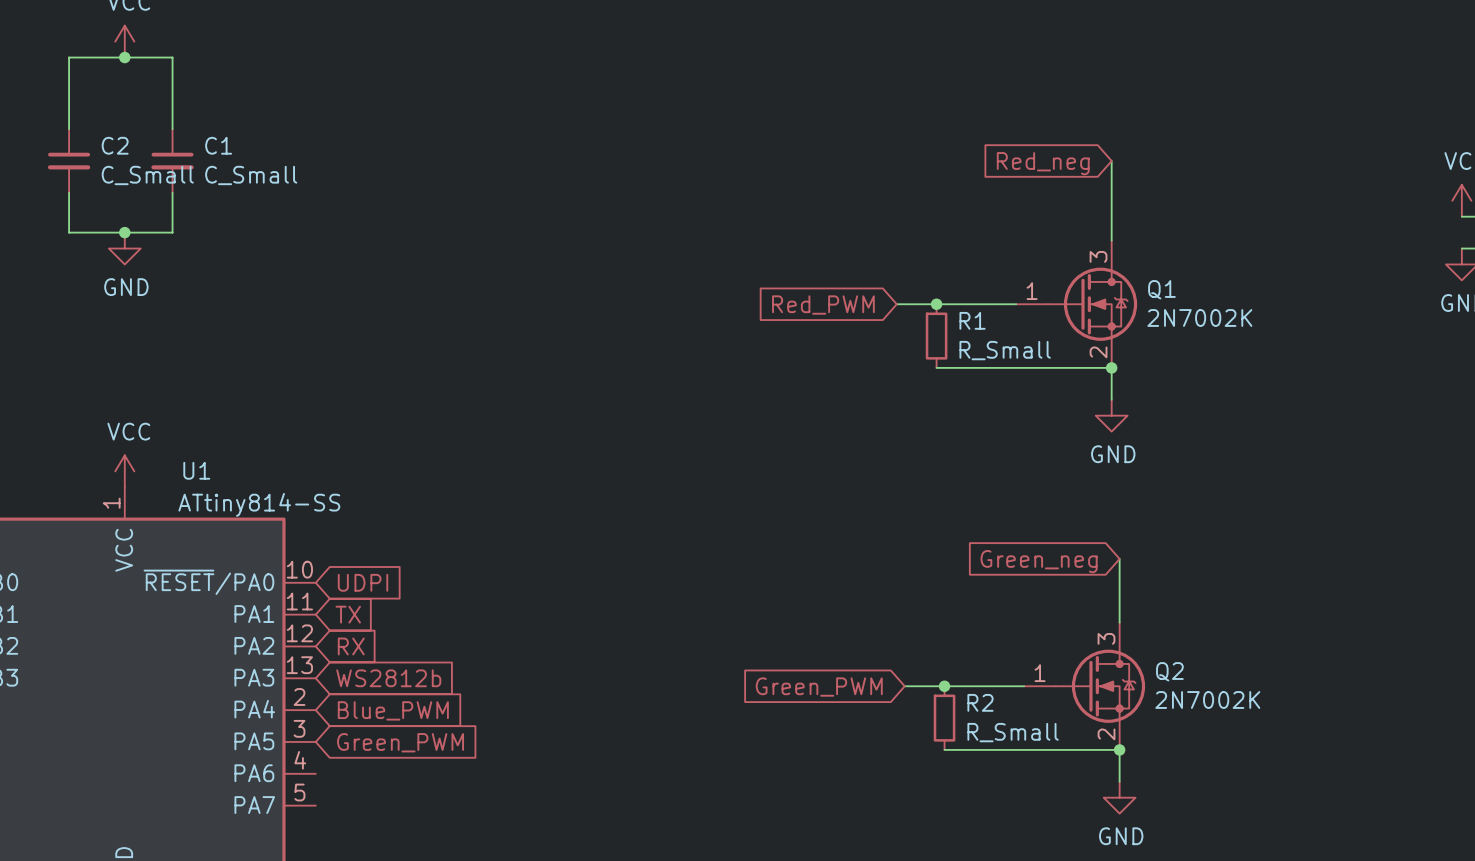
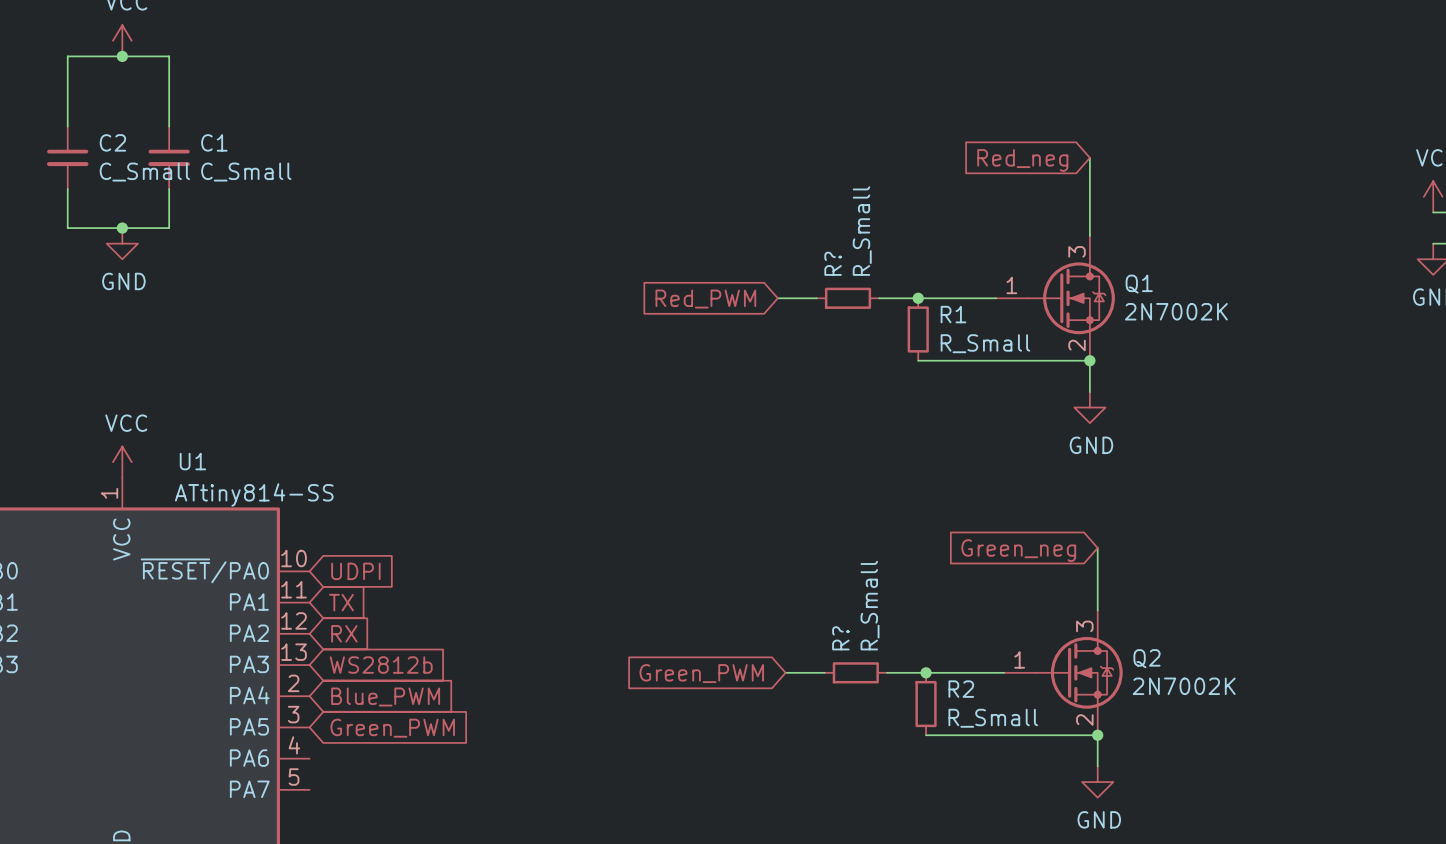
wire: none -> (777, 298) (816, 298)
R?: none -> R_Small (848, 298)
global label position: Red_PWM (823, 305) -> Red_PWM (705, 299)
wire: none -> (785, 672) (824, 672)
R?: none -> R_Small (855, 672)
global label position: Green_PWM (819, 687) -> Green_PWM (701, 673)

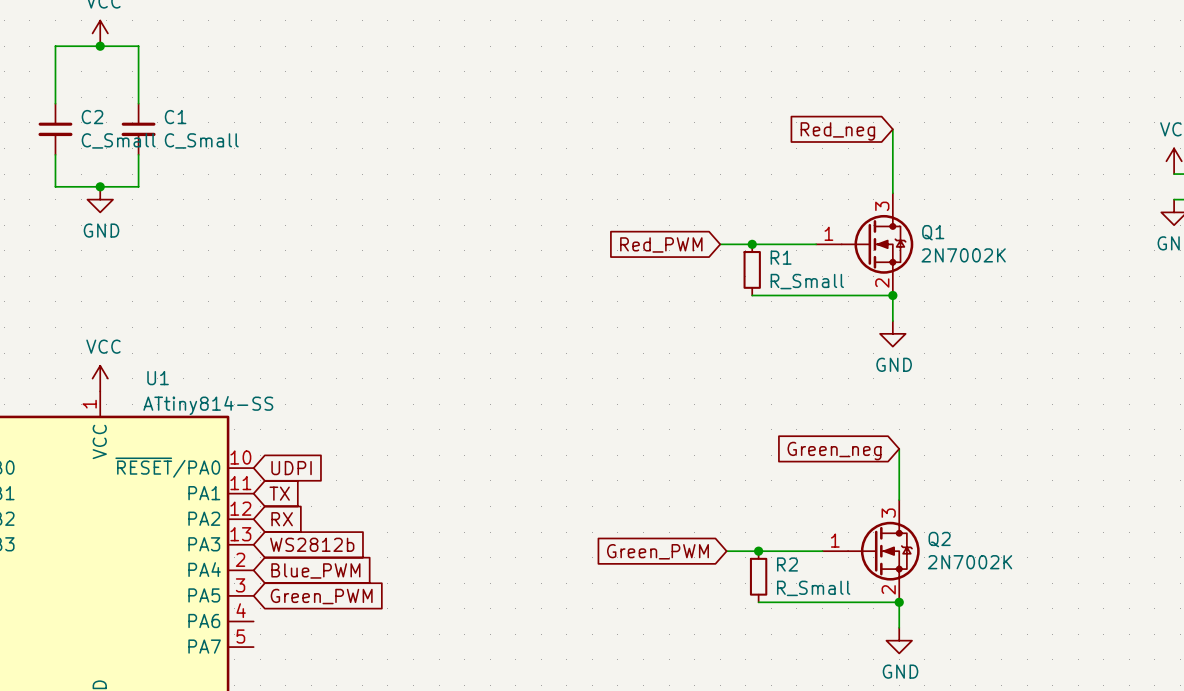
wire: (777, 298) (816, 298) -> none
R?: R_Small (848, 298) -> none
global label position: Red_PWM (705, 299) -> Red_PWM (661, 244)
wire: (785, 672) (824, 672) -> none
R?: R_Small (855, 672) -> none
global label position: Green_PWM (701, 673) -> Green_PWM (657, 551)

